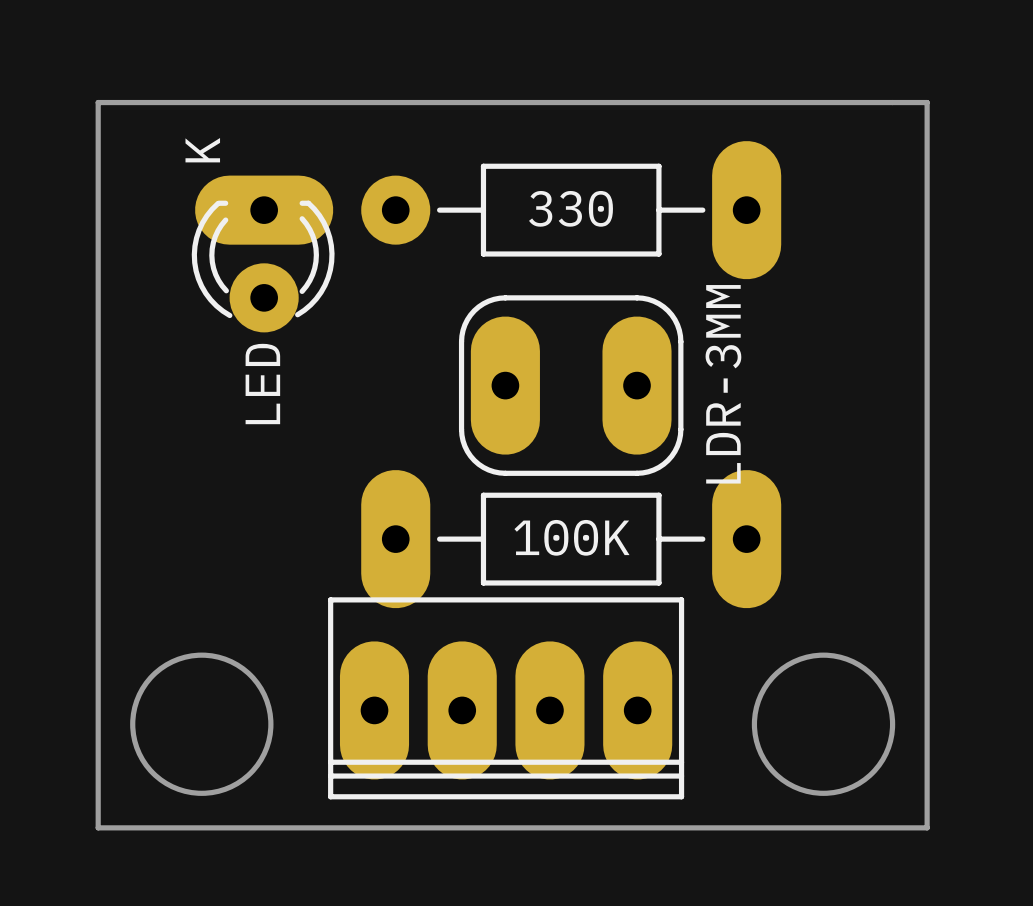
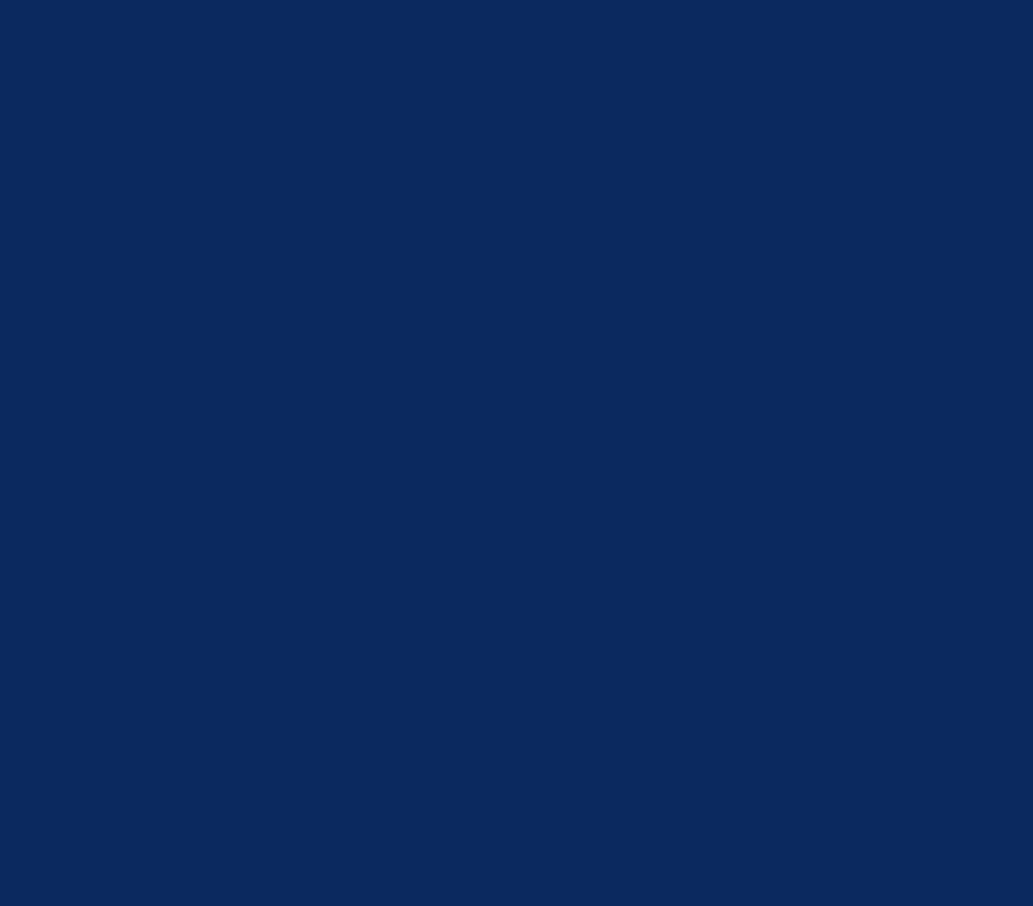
board edge: (98, 102) (98, 827) (927, 827) (927, 102) (98, 102) -> none
part: 330 (571, 210) -> none
part: LED (263, 253) -> none
part: LDR-3MM (571, 385) -> none
part: 100K (571, 539) -> none
round board edge: [130, 652, 274, 796] -> none
round board edge: [751, 652, 896, 796] -> none
part: (506, 698) -> none

